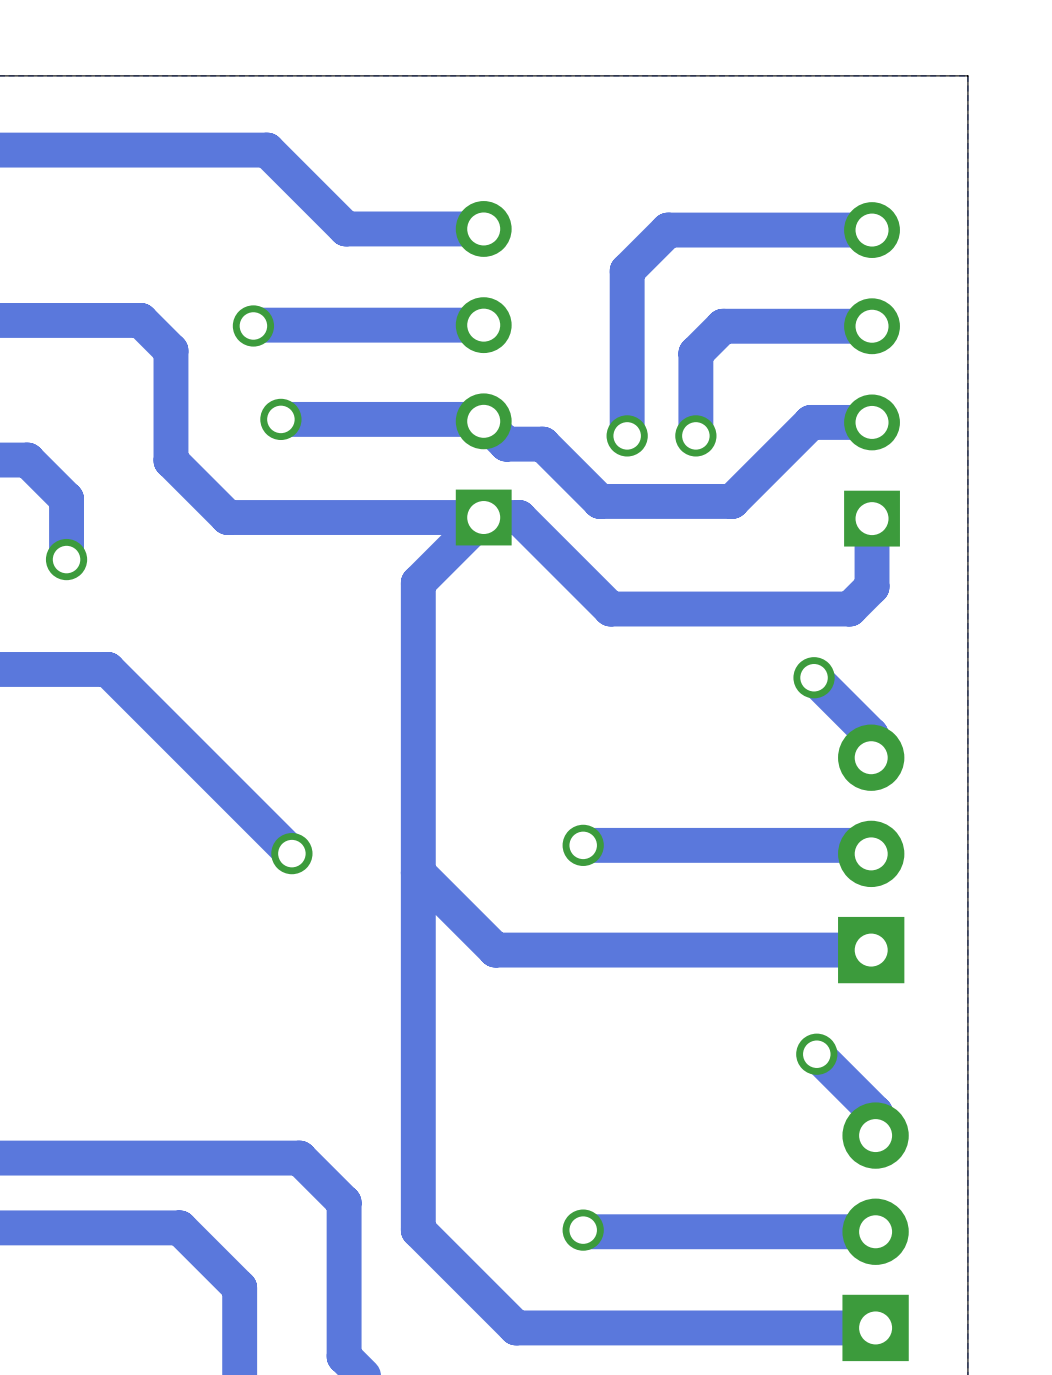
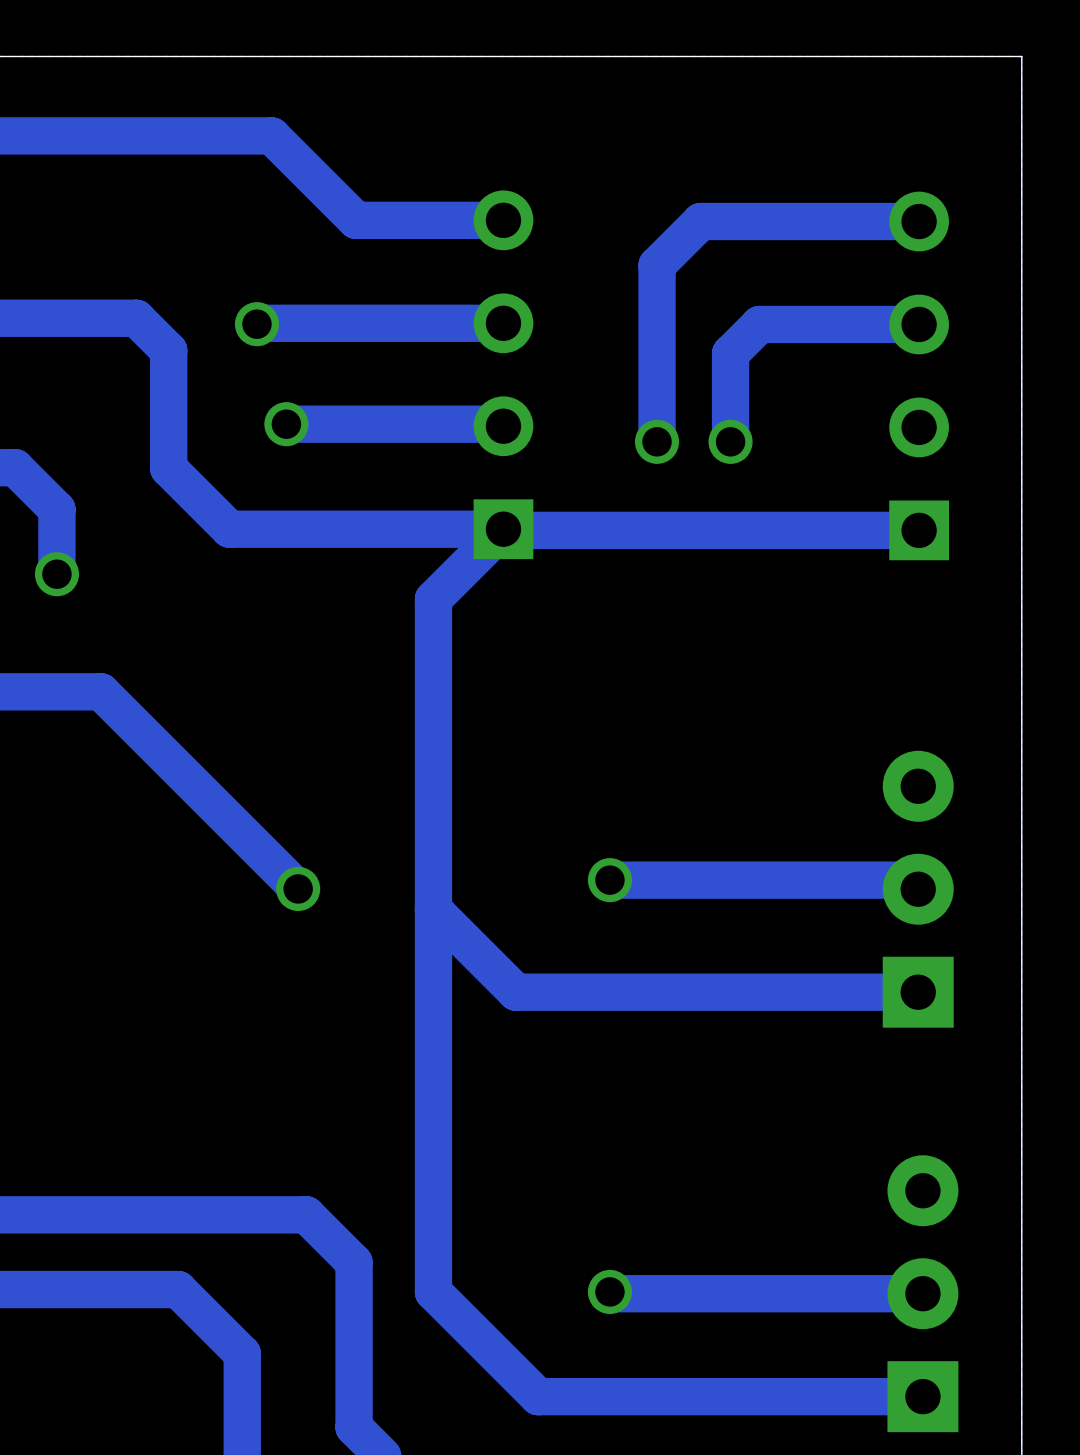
track: (483, 421) (506, 444) (542, 444) (600, 501) (732, 501) (811, 422) (872, 422) -> none
track: (483, 517) (519, 517) (610, 609) (849, 609) (872, 586) (872, 518) -> (503, 529) (919, 530)
track: (814, 677) (871, 734) (871, 757) -> none
via: (814, 677) -> none
track: (816, 1054) (875, 1113) (875, 1135) -> none
via: (816, 1054) -> none

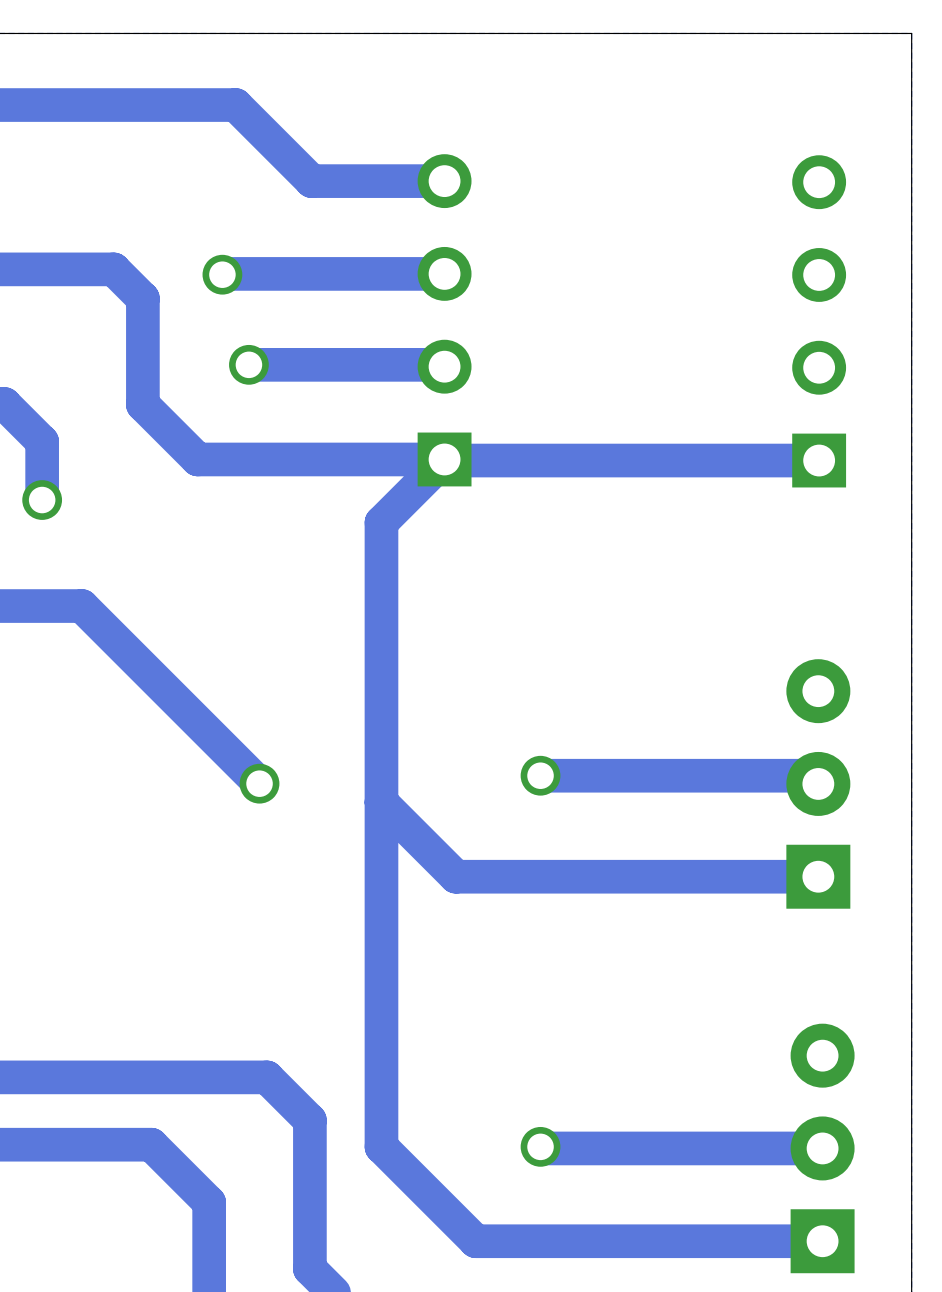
track: (919, 221) (700, 221) (657, 265) (657, 441) -> none
track: (919, 324) (759, 324) (730, 353) (730, 441) -> none
via: (657, 441) -> none
via: (730, 441) -> none

